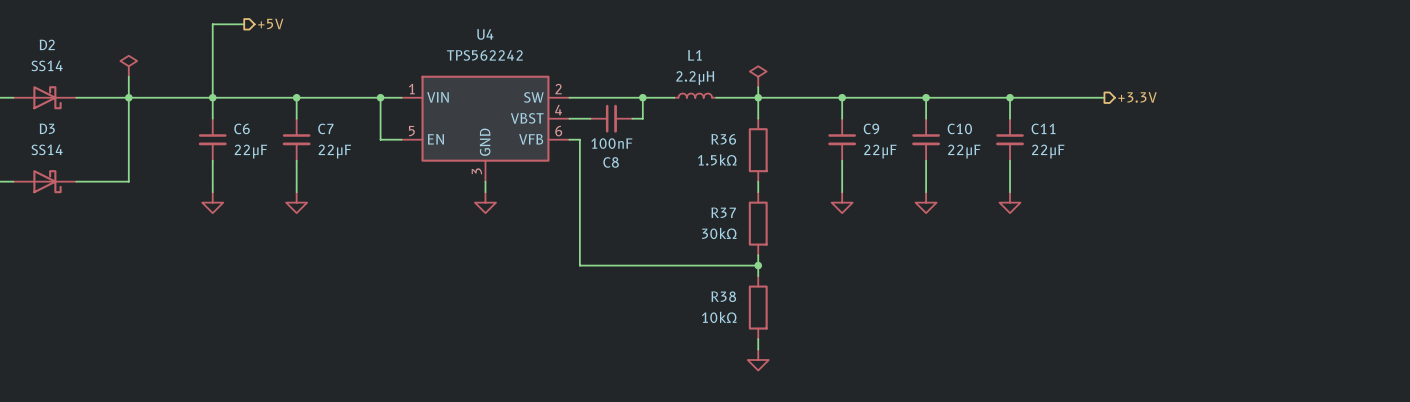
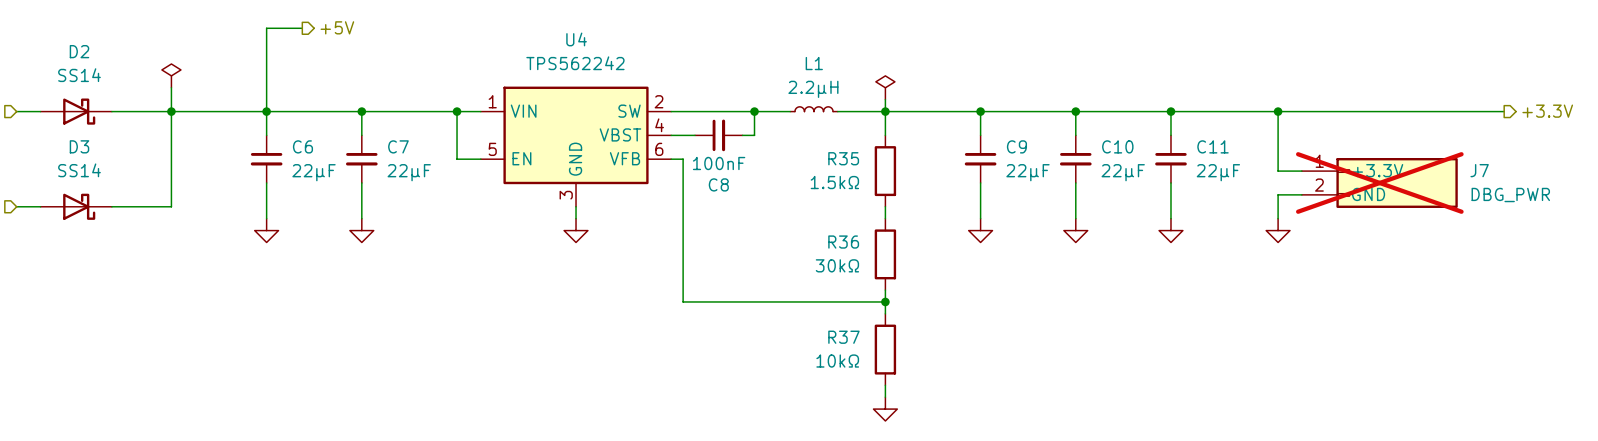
junction: none -> (1278, 111)
hierarchical label position: +3.3V (1137, 97) -> +3.3V (1547, 111)
wire: none -> (1504, 111) (1278, 111) (1278, 171) (1301, 171)
R36 name: R36 (723, 139) -> R35 (843, 158)
J7: none -> (1379, 182)
wire: none -> (1301, 194) (1278, 194) (1278, 218)
power symbol: none -> (1278, 230)
R37 name: R37 (723, 212) -> R36 (843, 242)
R38 name: R38 (723, 296) -> R37 (843, 337)

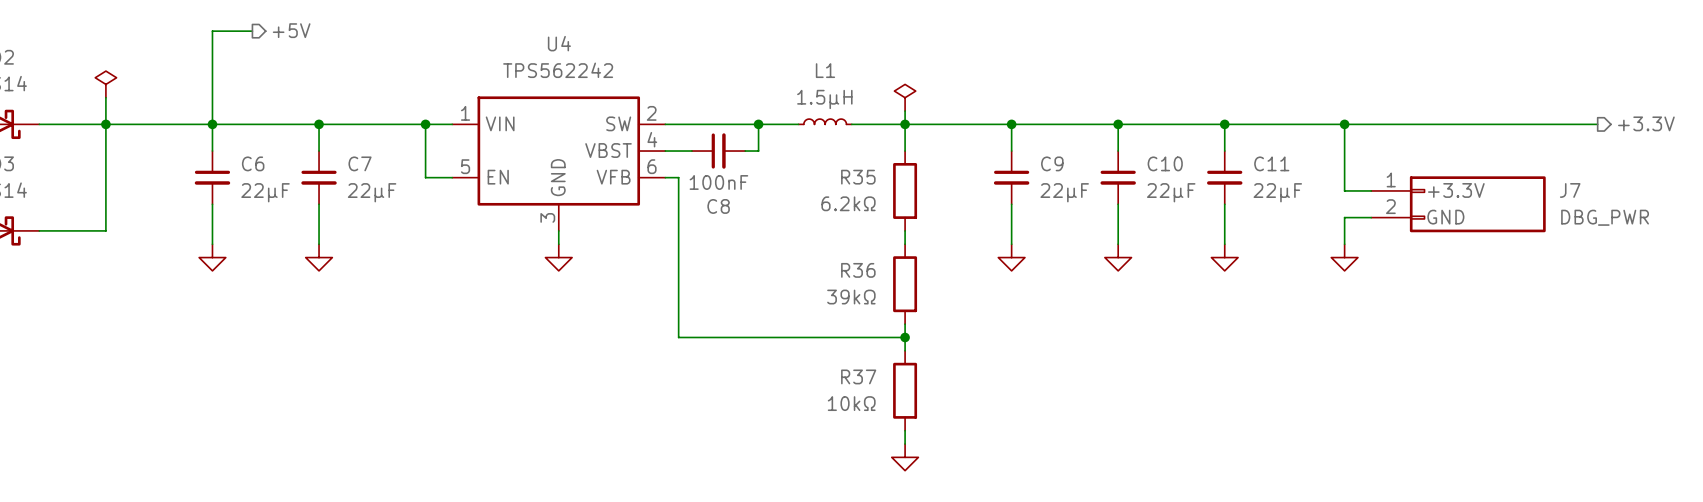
L1 value: 2.2μH (813, 89) -> 1.5μH (824, 99)
R35 value: 1.5kΩ (834, 182) -> 6.2kΩ (848, 203)
J7 do-not-place cross: (1379, 182) -> none
R36 value: 30kΩ (837, 265) -> 39kΩ (851, 297)

